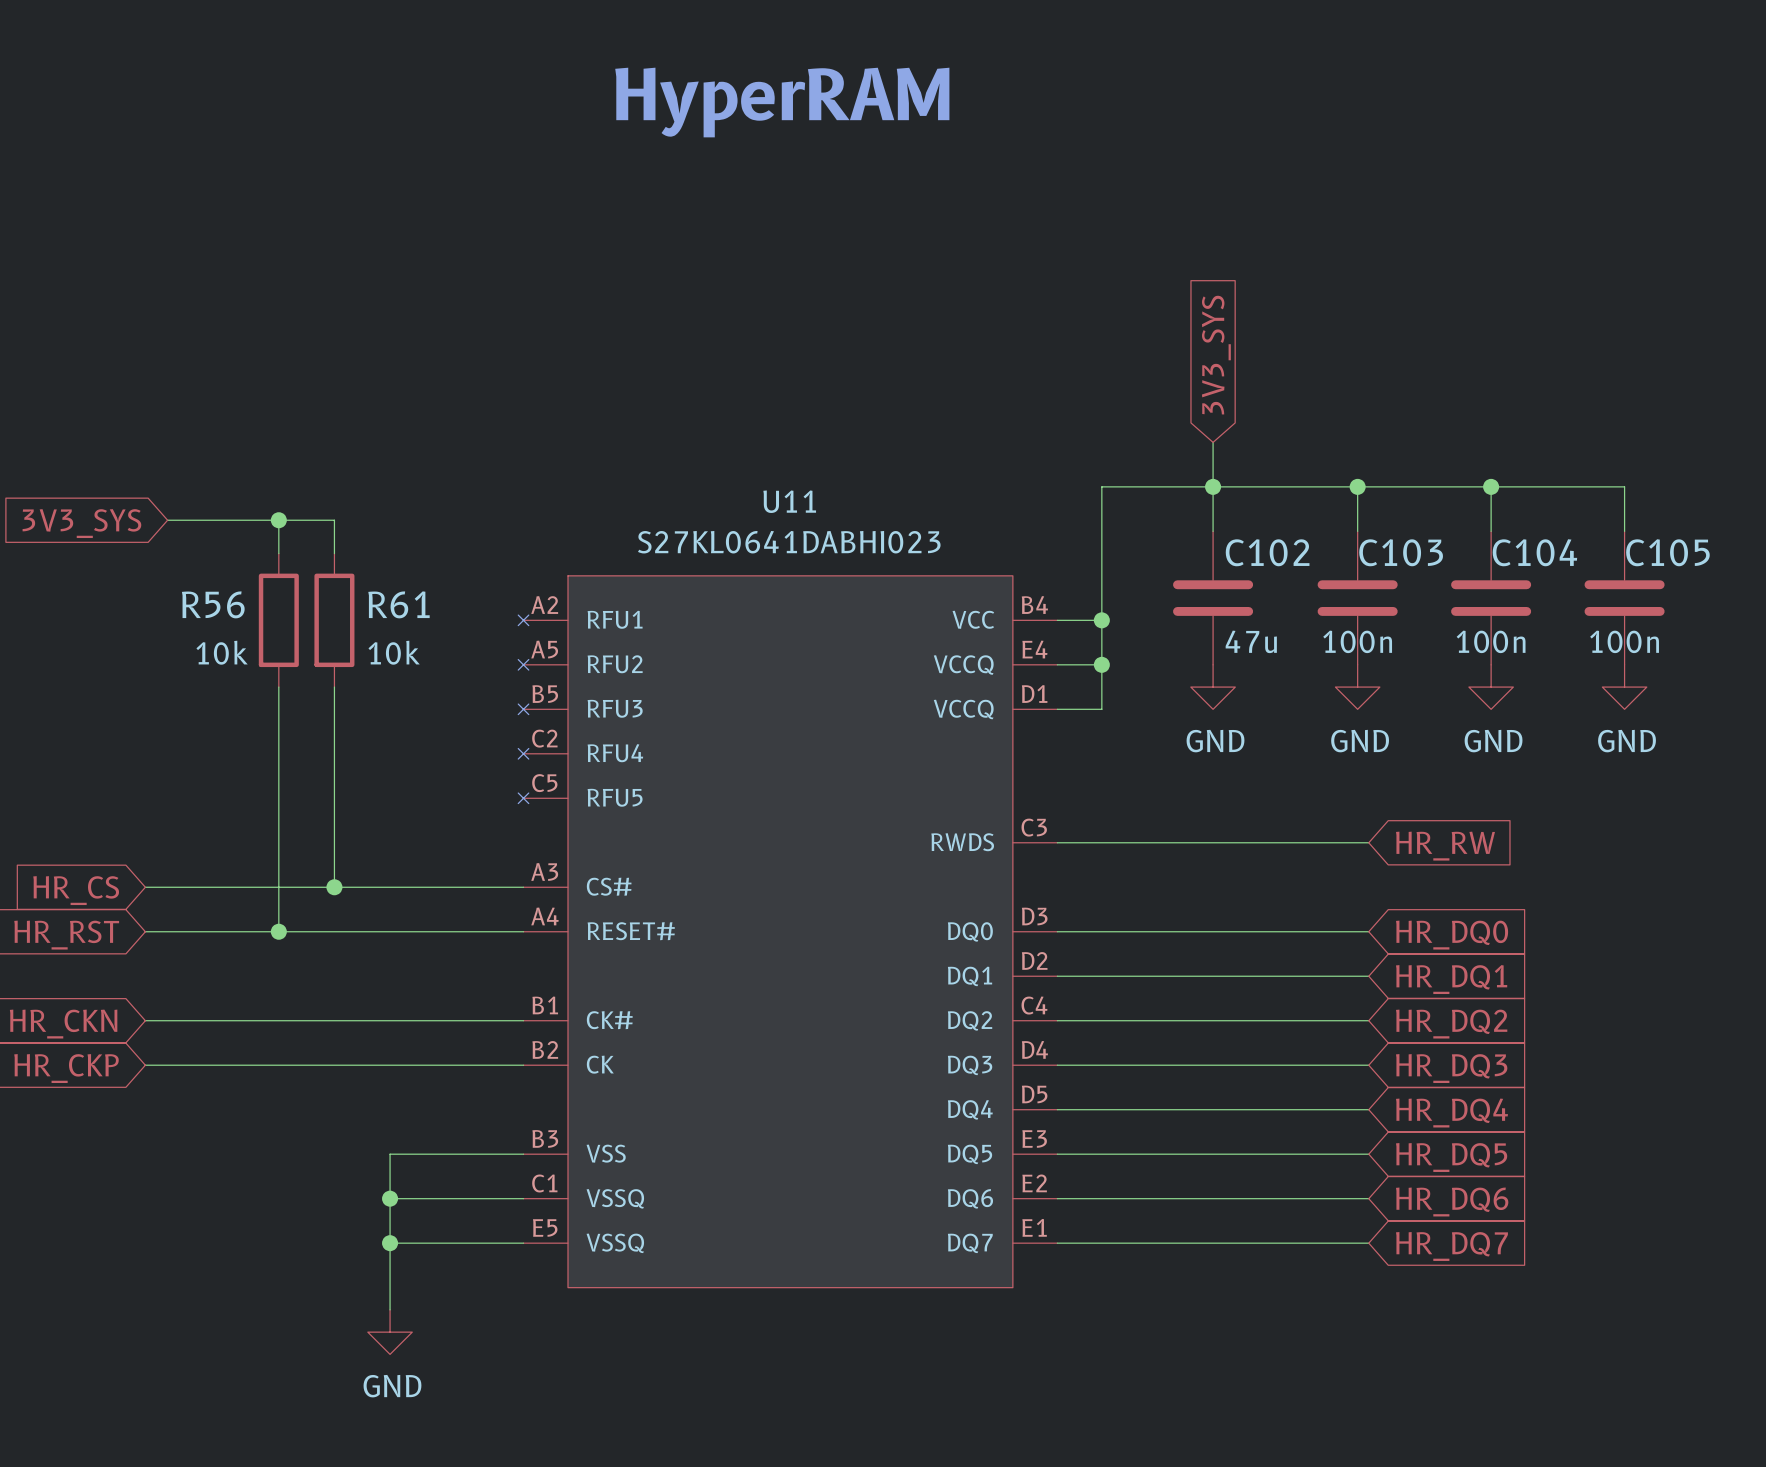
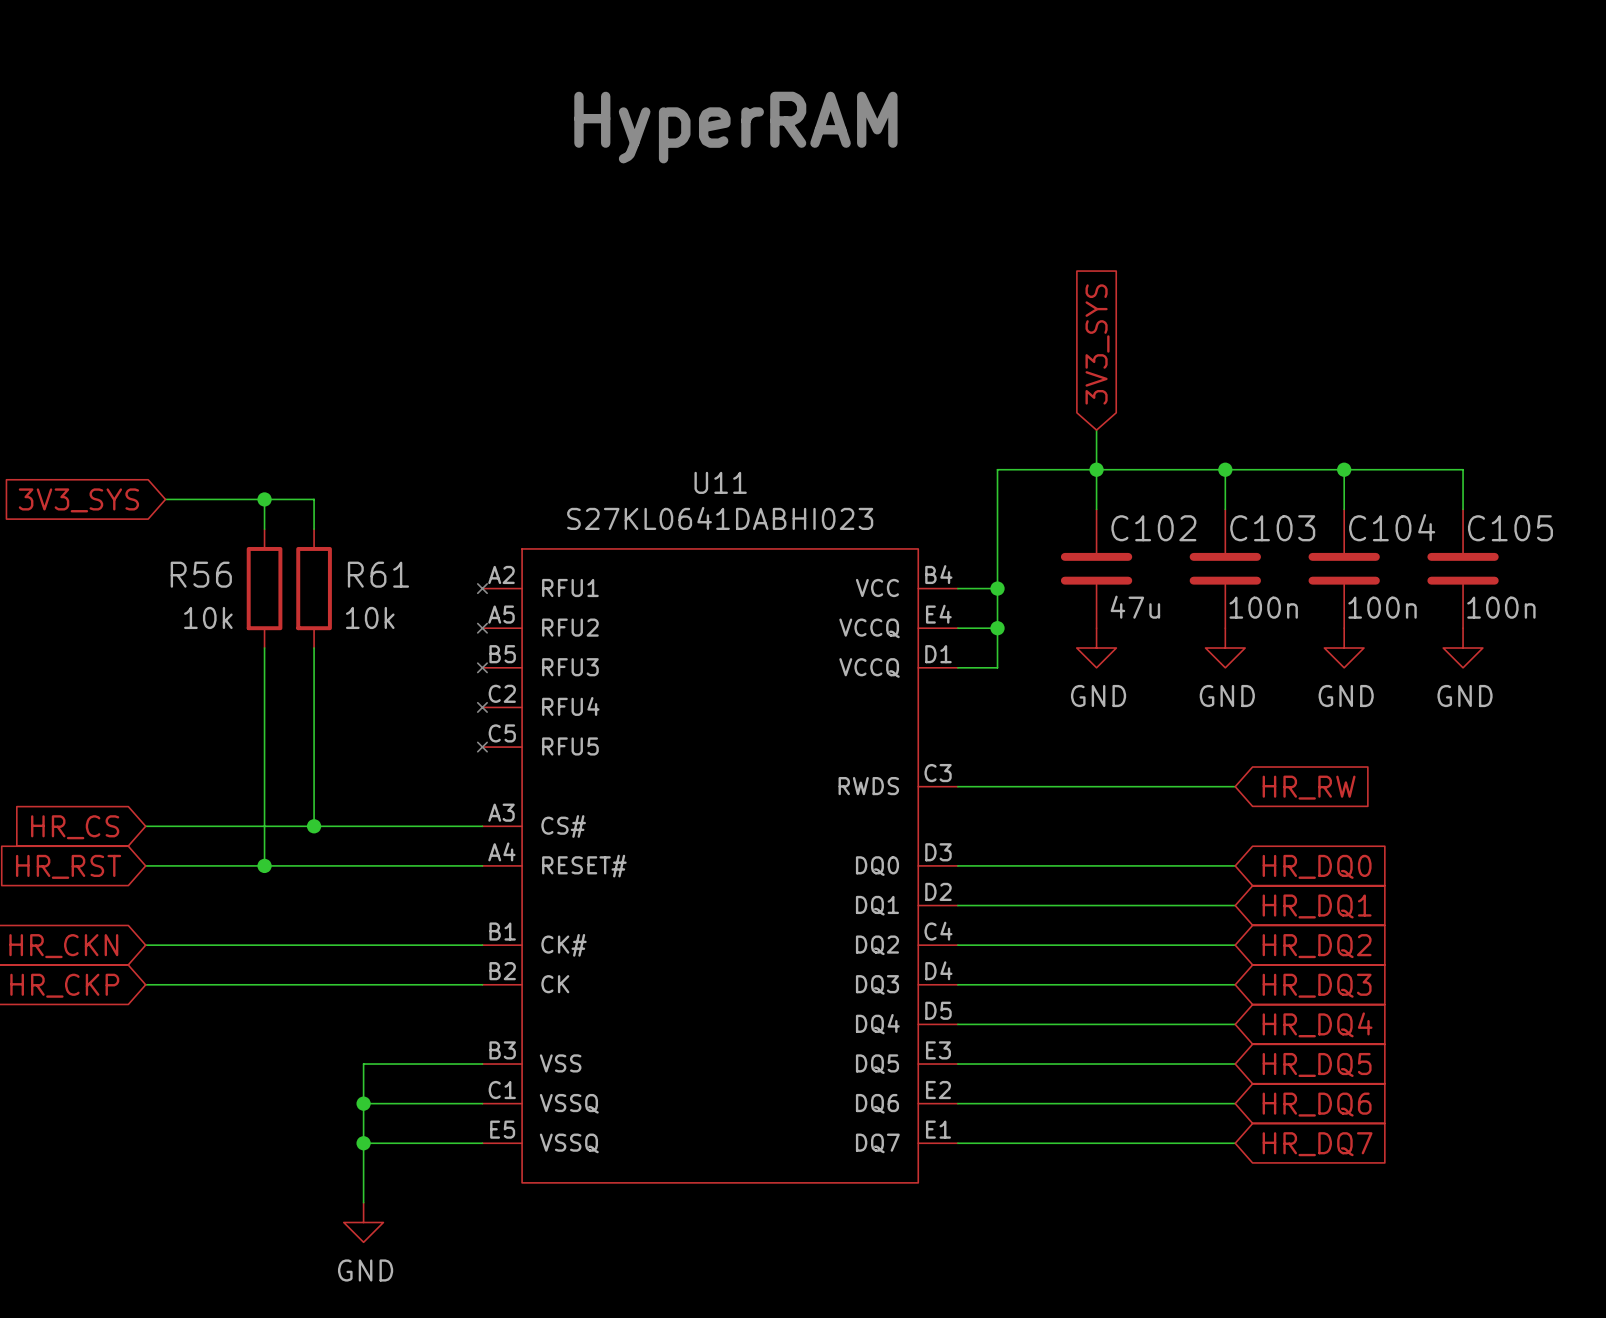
C103 text position: 100n (1357, 641) -> 100n (1263, 607)
C104 text position: 100n (1491, 641) -> 100n (1382, 607)
C105 text position: 100n (1624, 641) -> 100n (1501, 607)

